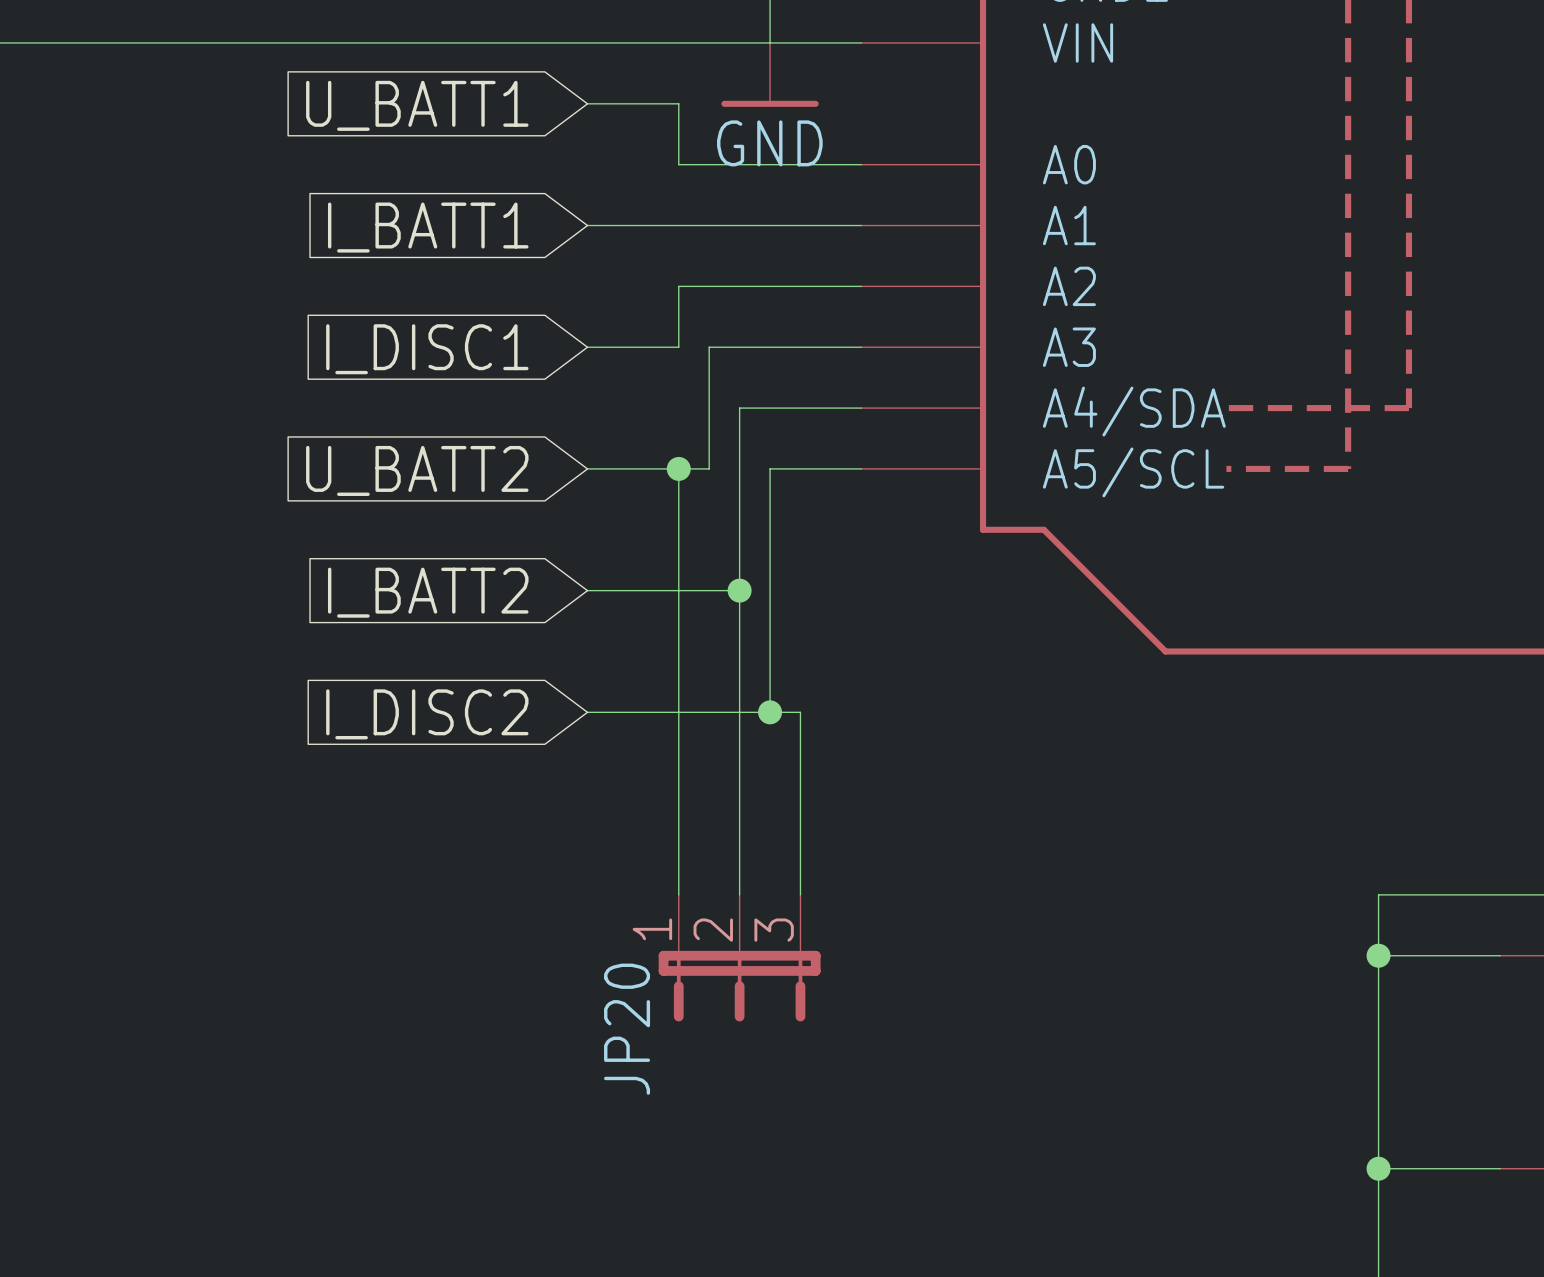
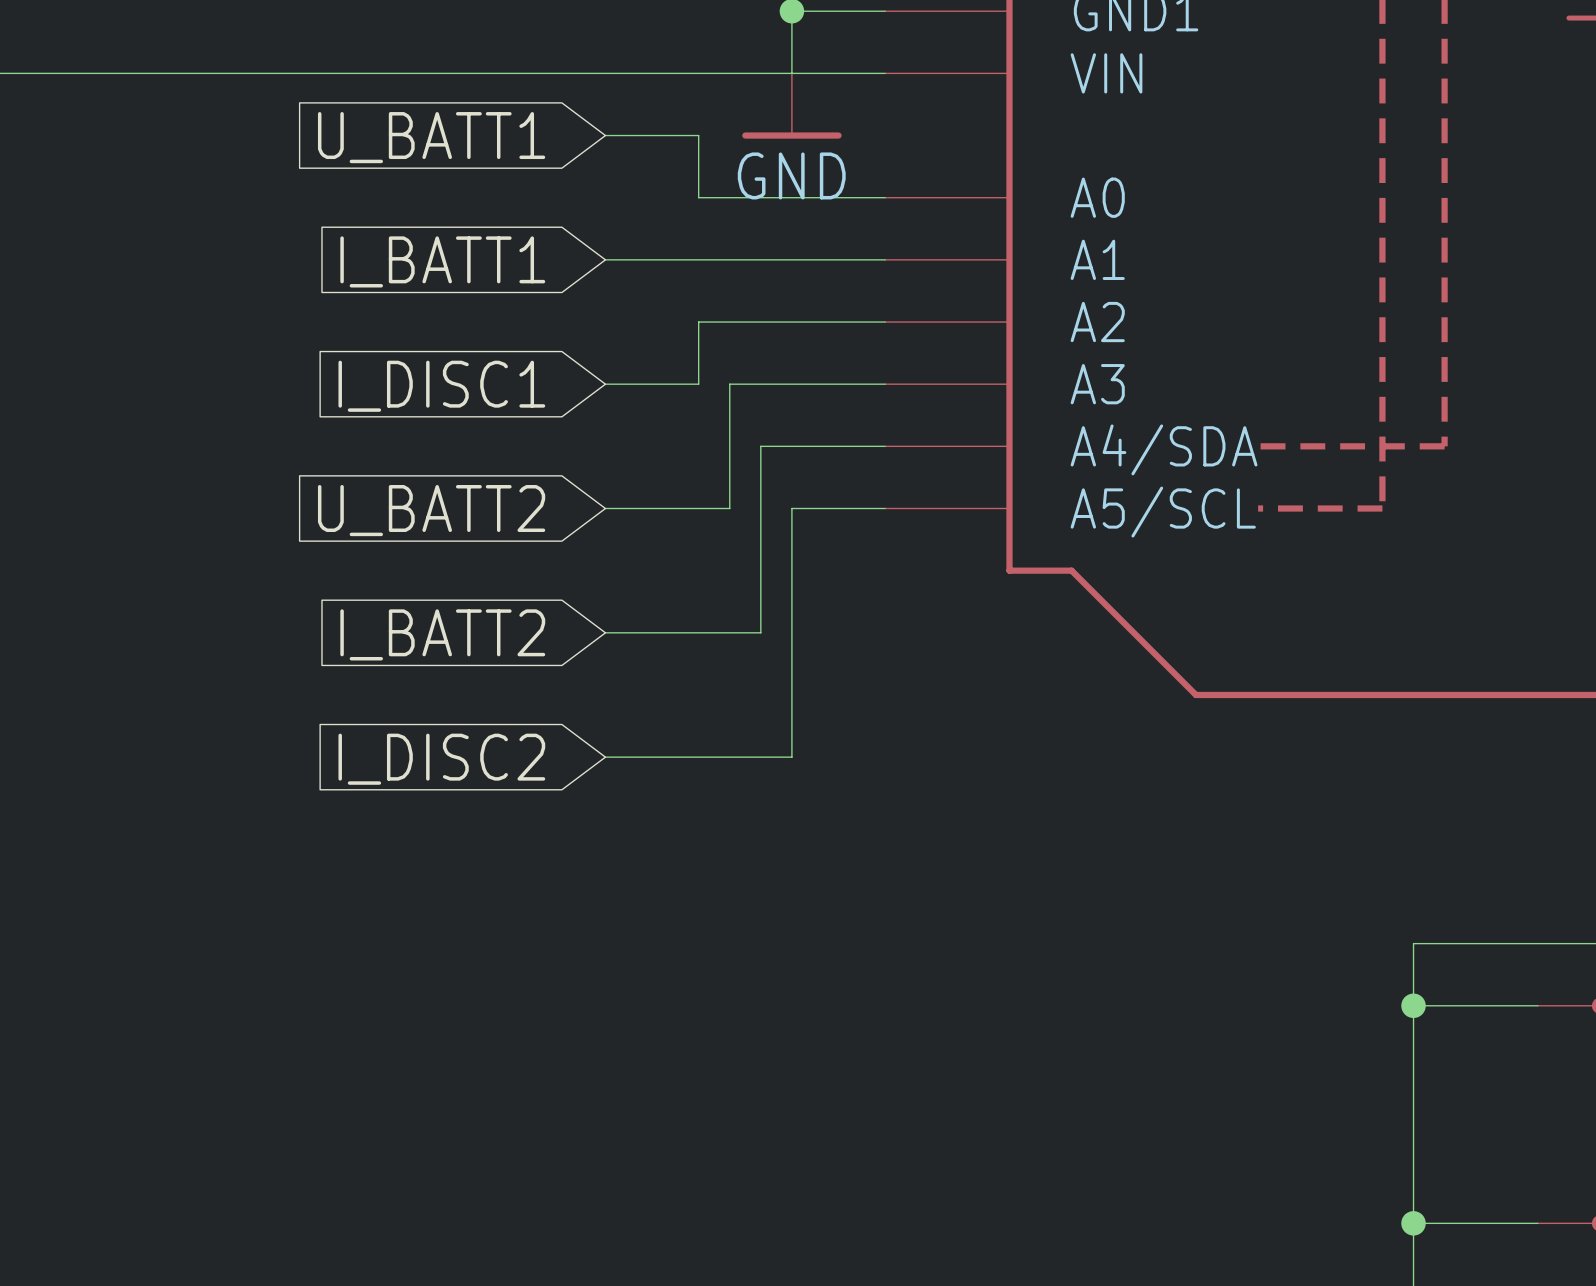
wire: (678, 468) (678, 894) -> none
junction: (678, 468) -> none
wire: (739, 590) (739, 894) -> none
junction: (739, 590) -> none
wire: (770, 712) (800, 712) (800, 894) -> none
junction: (770, 712) -> none
JP20: (739, 958) -> none

